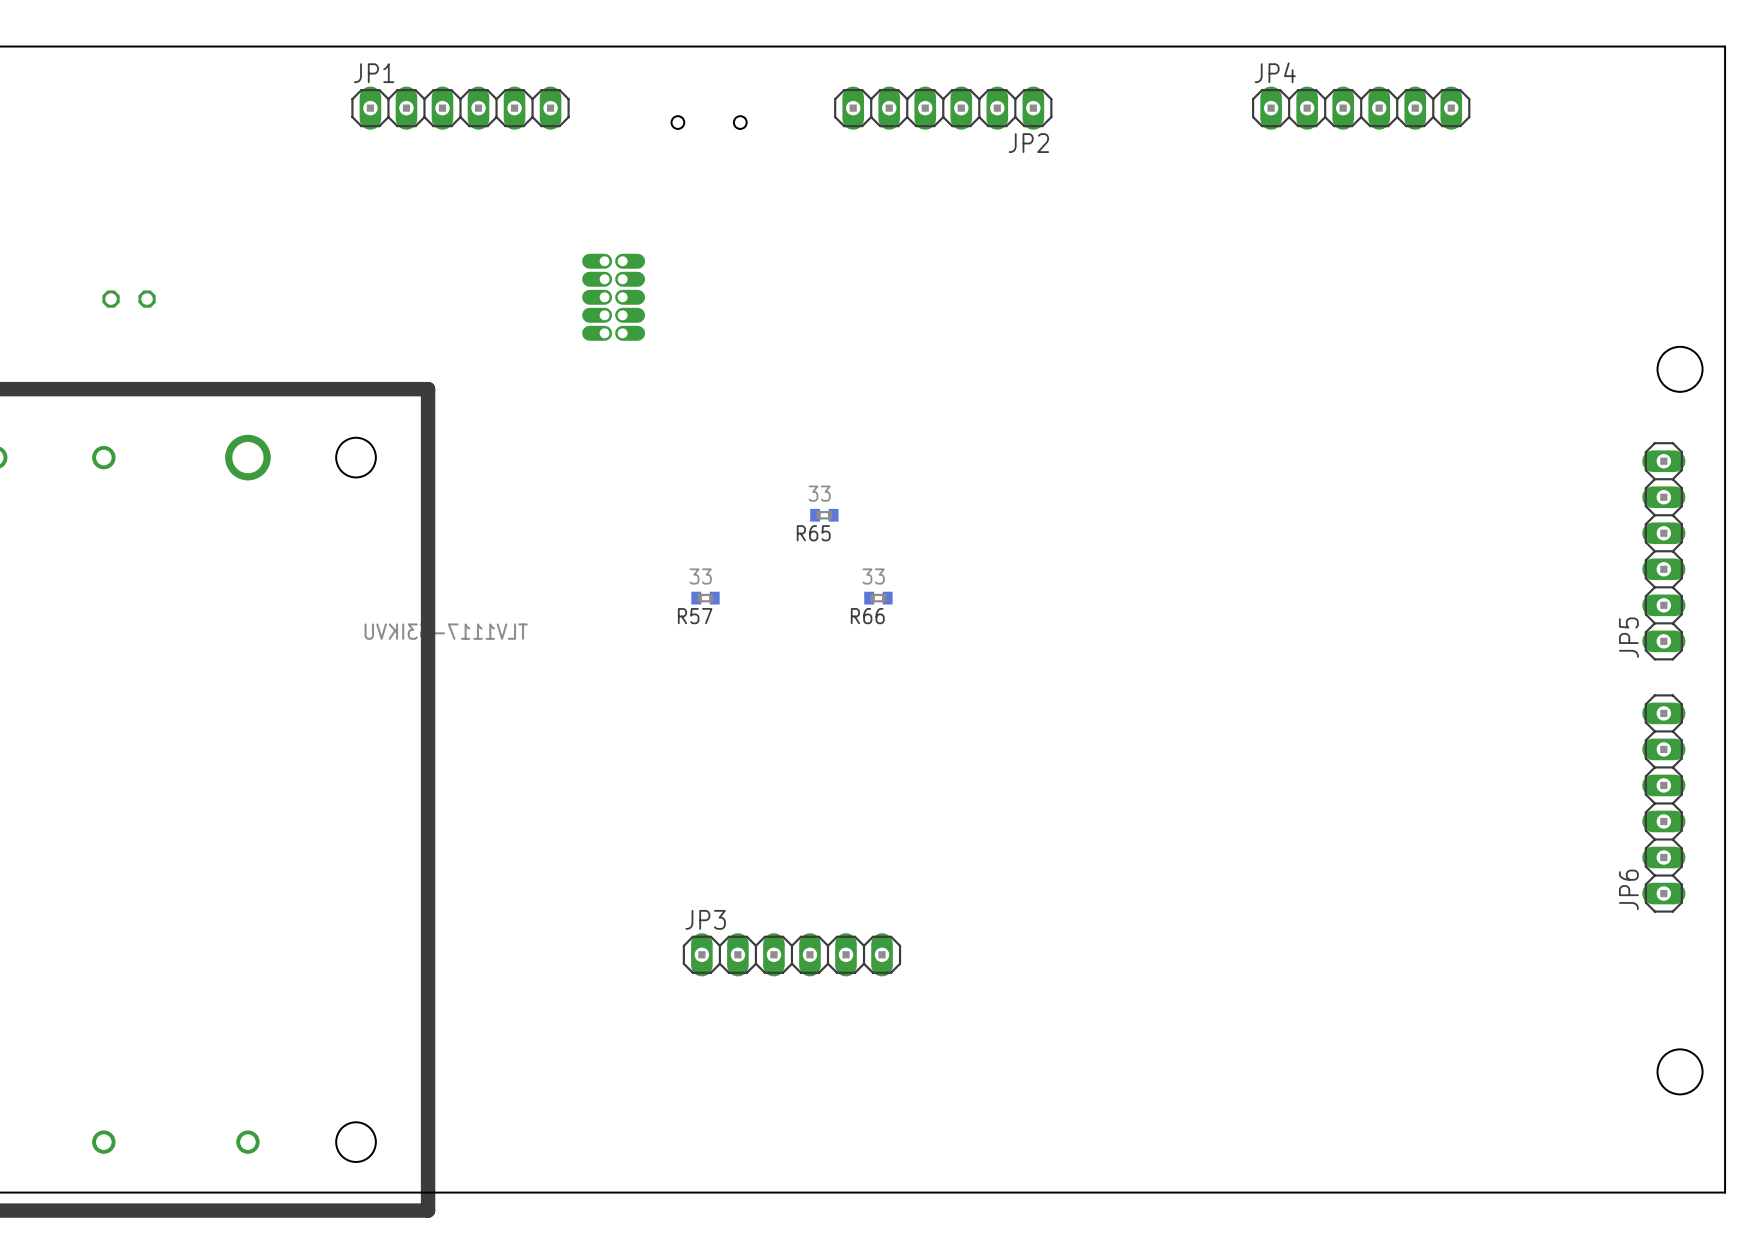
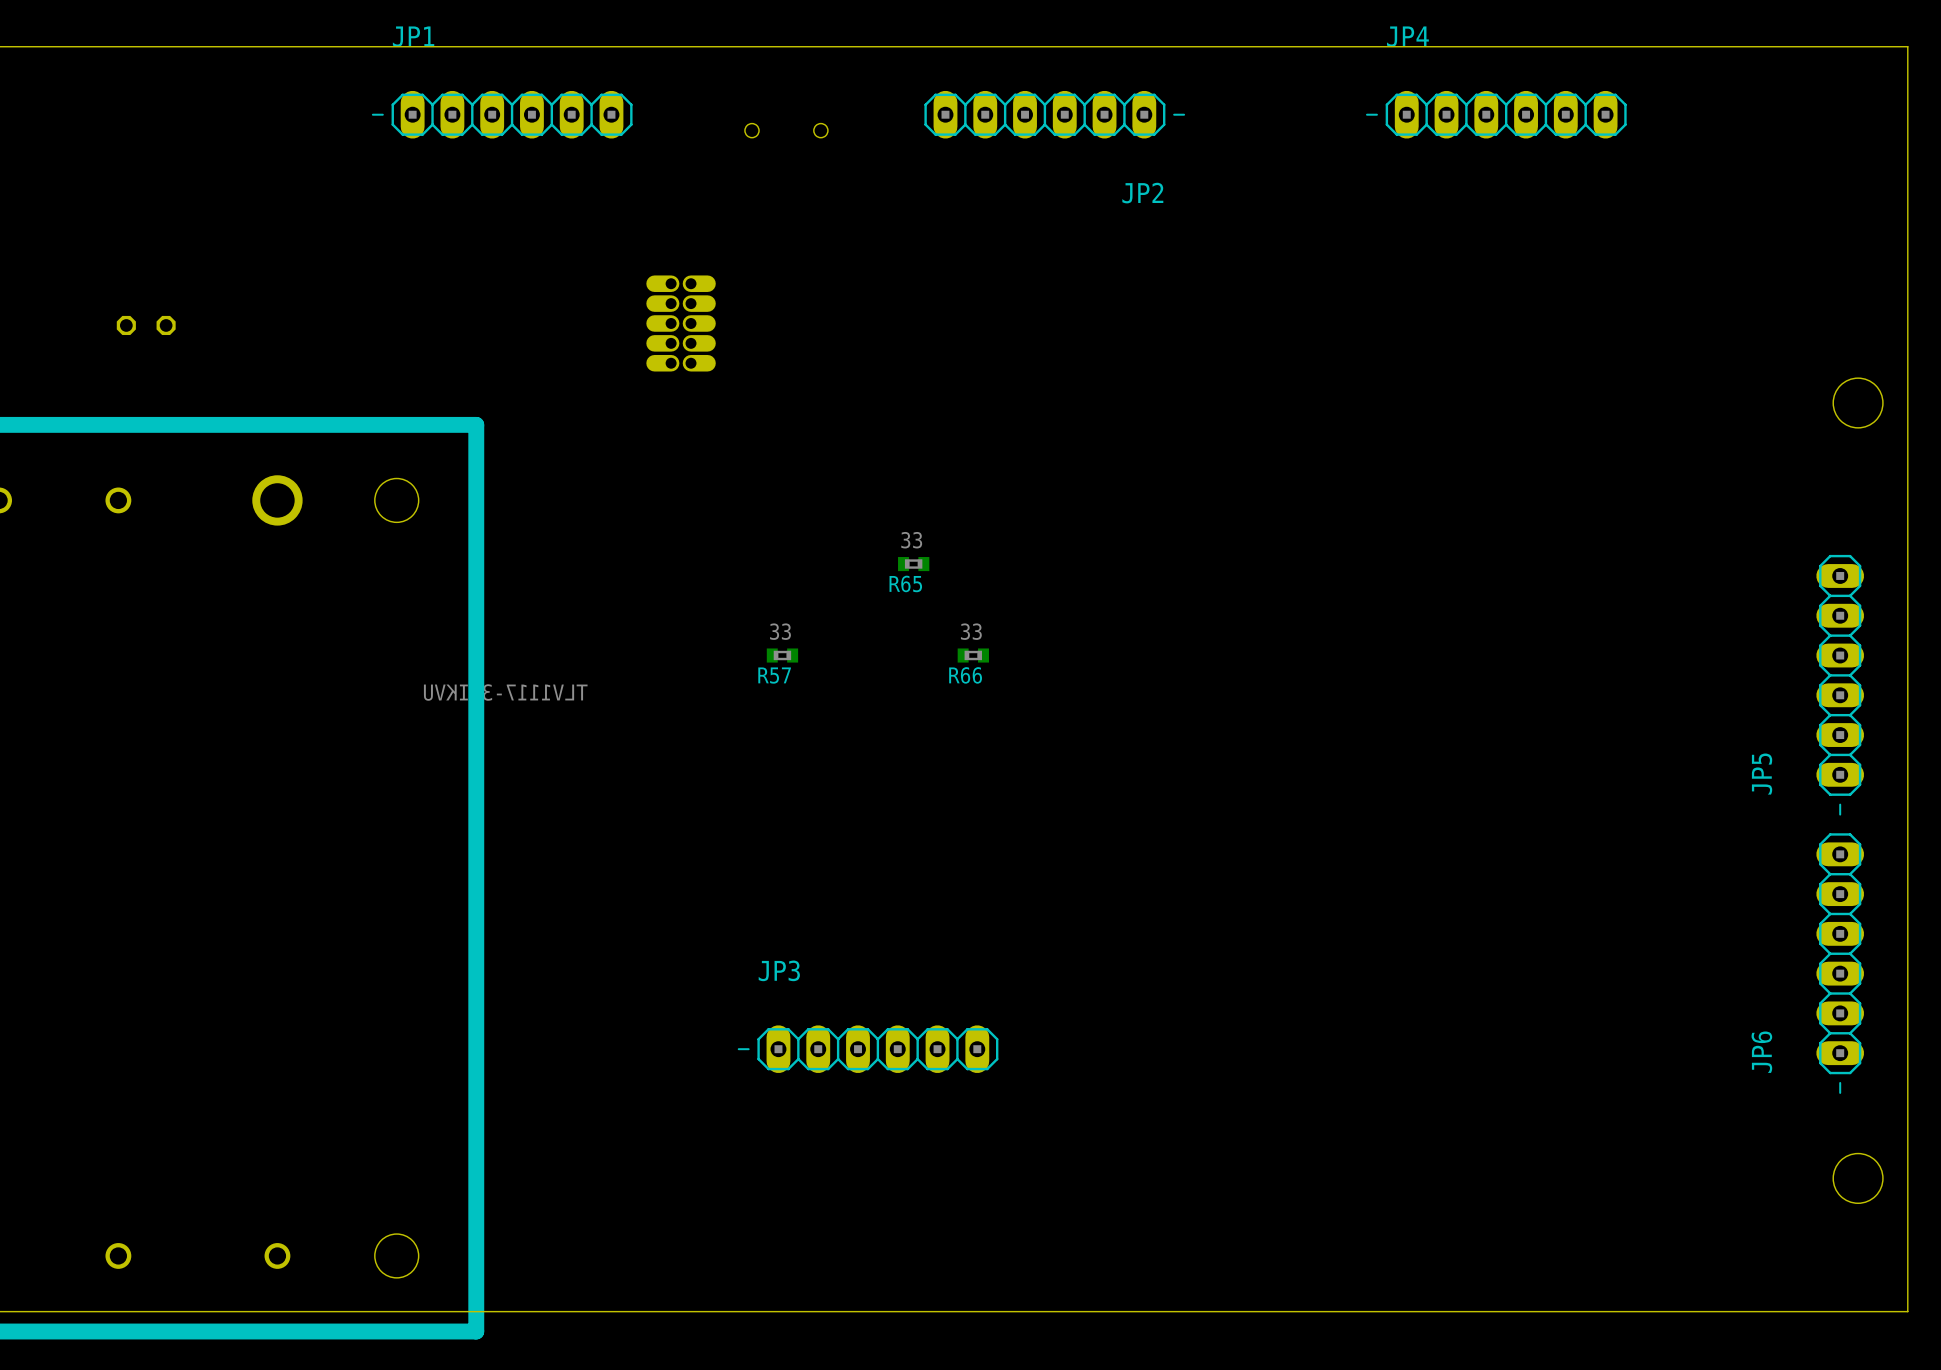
JP4 name position: JP4 (1275, 72) -> JP4 (1407, 36)
JP1 name position: JP1 (374, 73) -> JP1 (413, 36)
JP1 footprint: [351, 86, 570, 130] -> [371, 90, 633, 139]
JP2 footprint: [834, 86, 1053, 130] -> [924, 90, 1186, 139]
JP4 footprint: [1252, 86, 1471, 130] -> [1366, 90, 1627, 139]
JP2 name position: JP2 (1028, 143) -> JP2 (1142, 193)
JP5 footprint: [1642, 442, 1686, 661] -> [1816, 554, 1865, 816]
JP5 name position: JP5 (1628, 637) -> JP5 (1762, 774)
JP6 footprint: [1642, 694, 1686, 913] -> [1816, 833, 1865, 1094]
JP6 name position: JP6 (1628, 889) -> JP6 (1761, 1052)
JP3 name position: JP3 (705, 919) -> JP3 (779, 970)
JP3 footprint: [682, 933, 902, 977] -> [737, 1025, 999, 1074]

